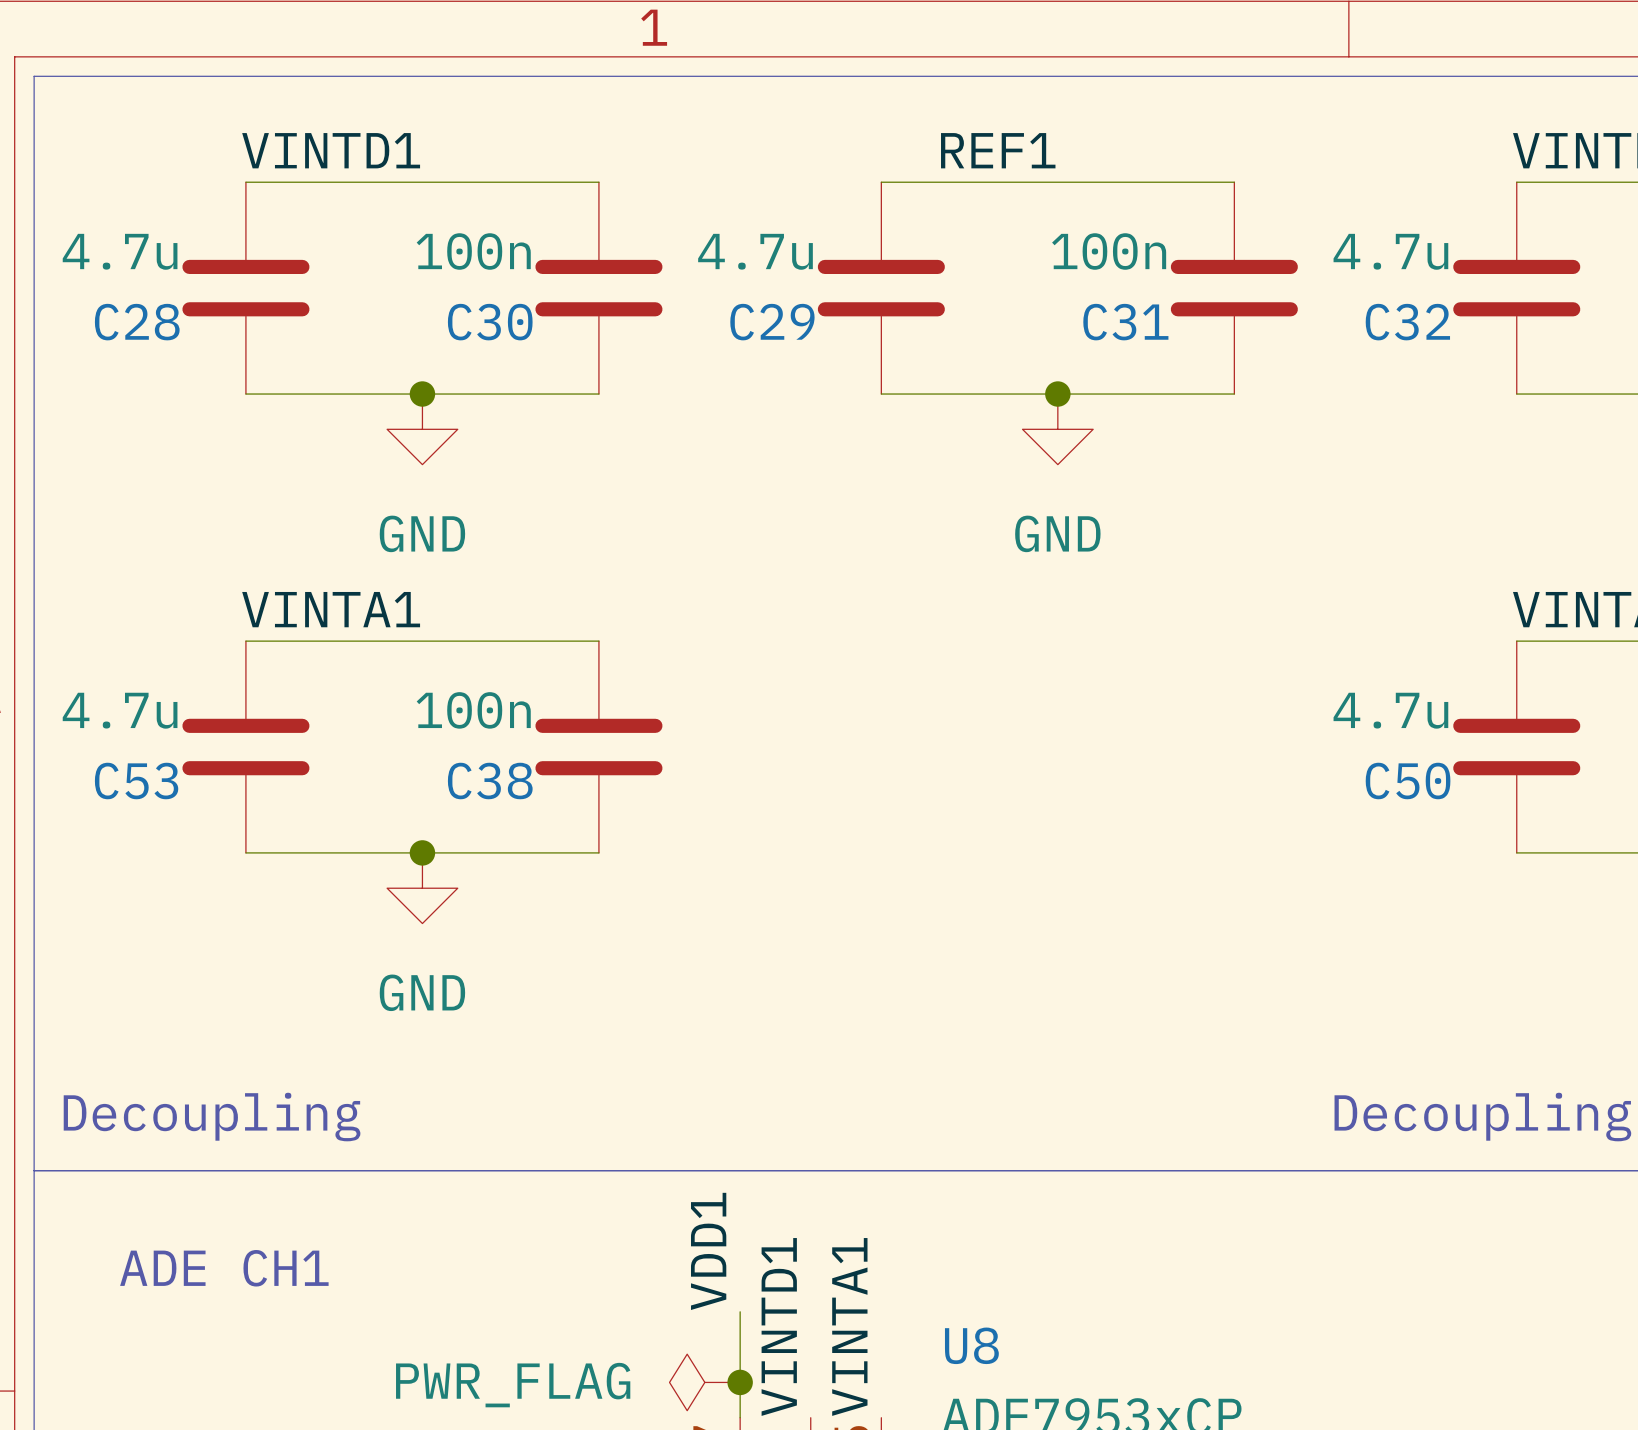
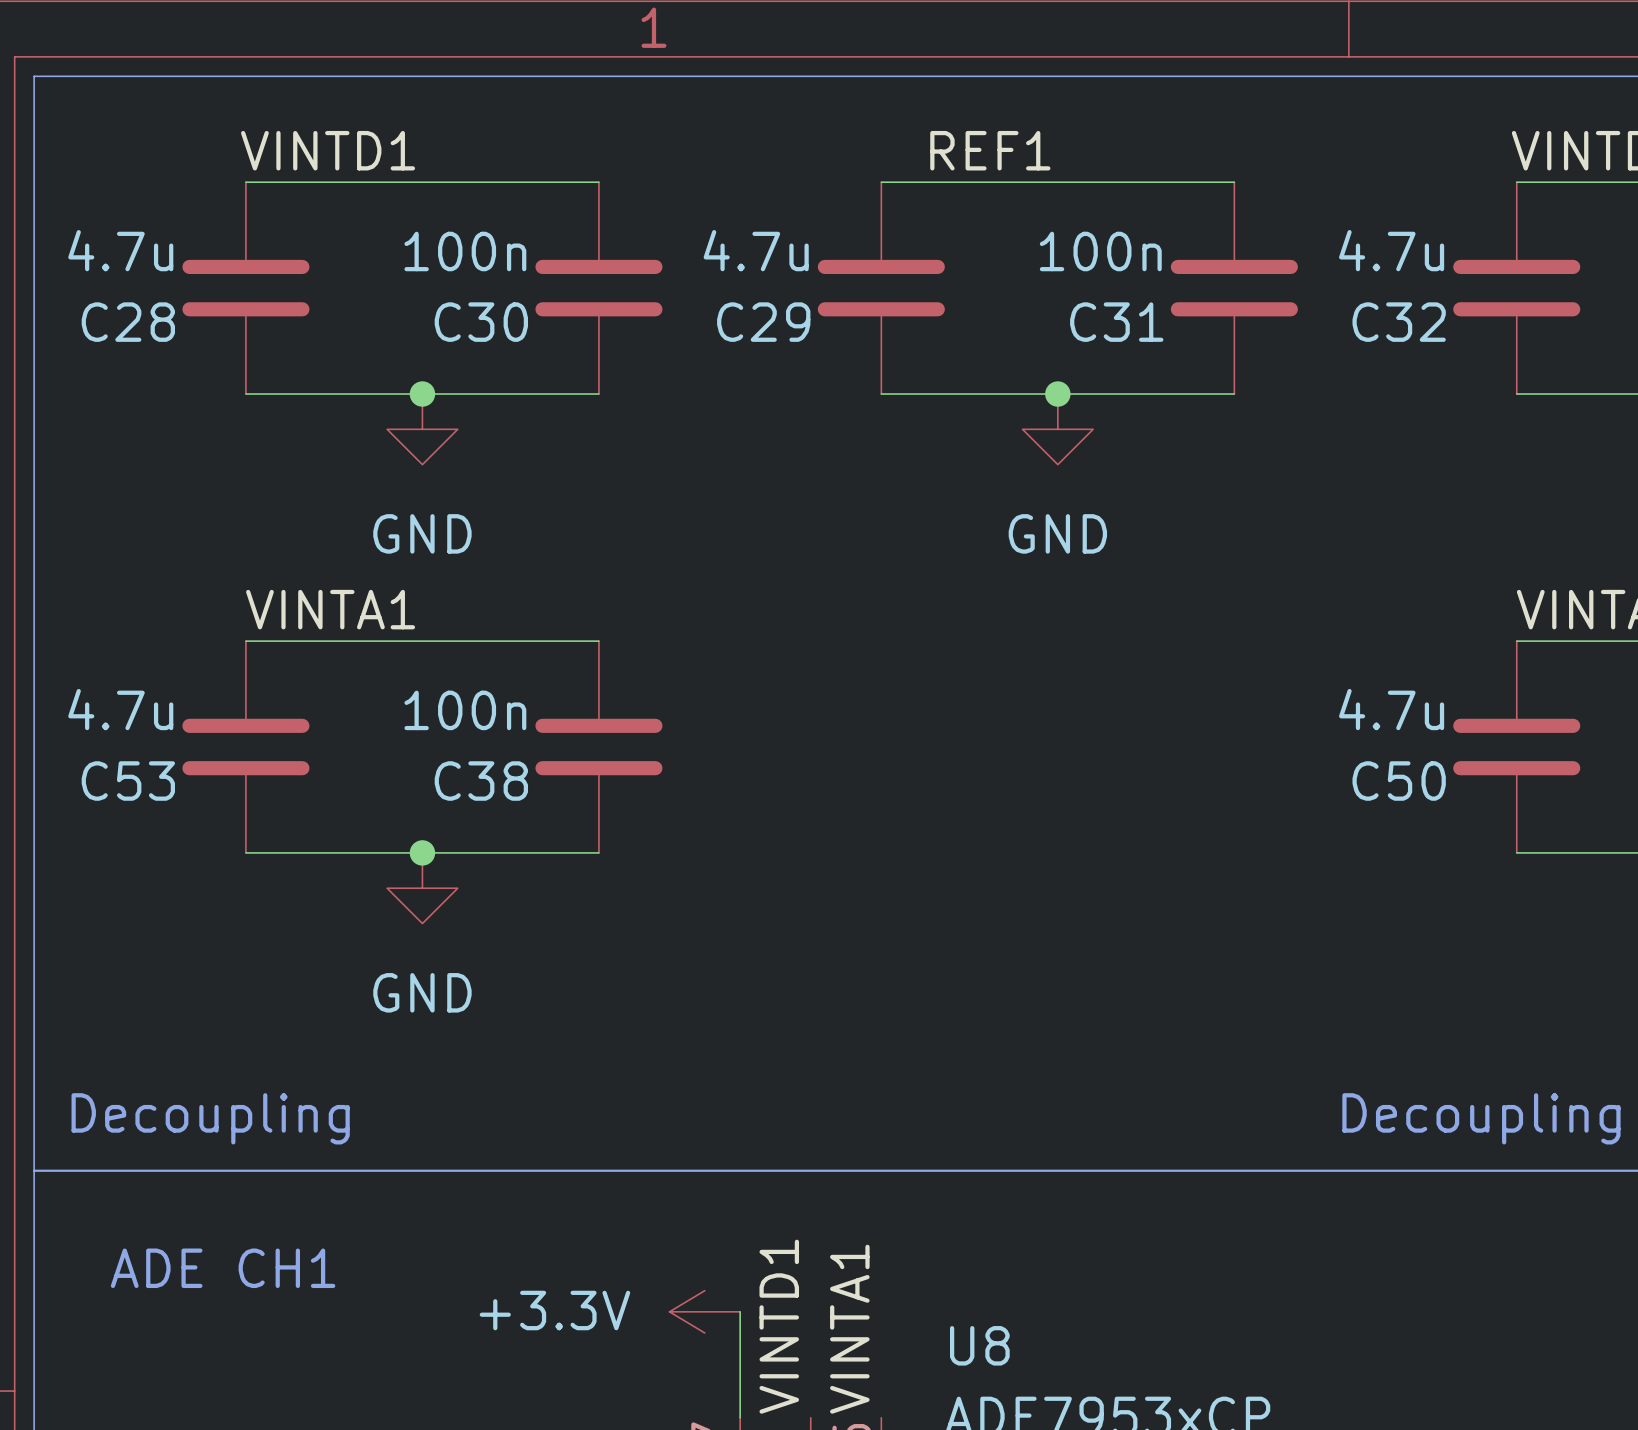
label: VDD1 (708, 1251) -> none
power symbol: none -> +3.3V (704, 1311)
power symbol: PWR_FLAG (704, 1382) -> none
junction: (740, 1382) -> none

